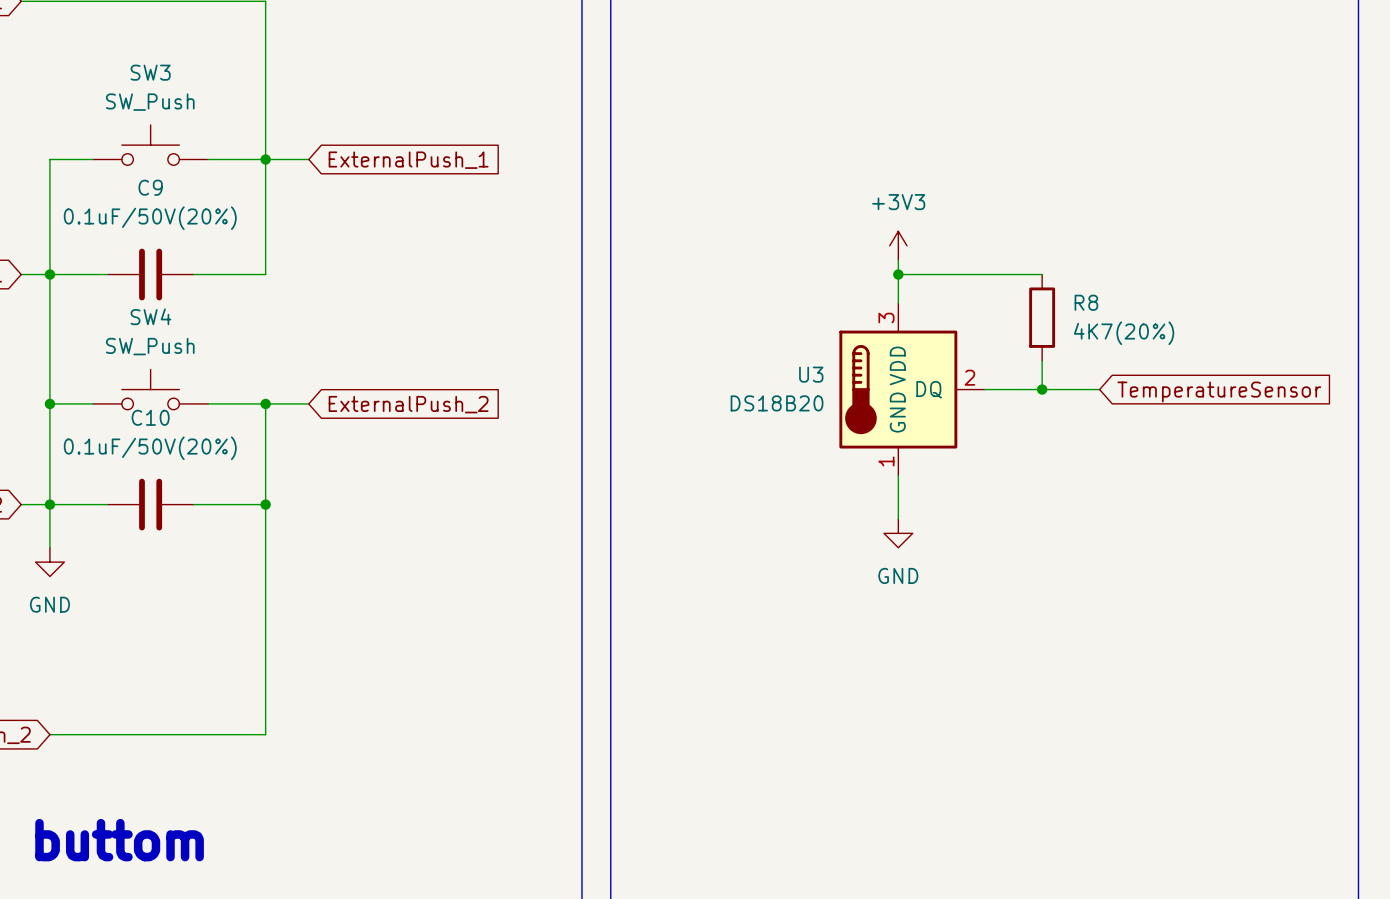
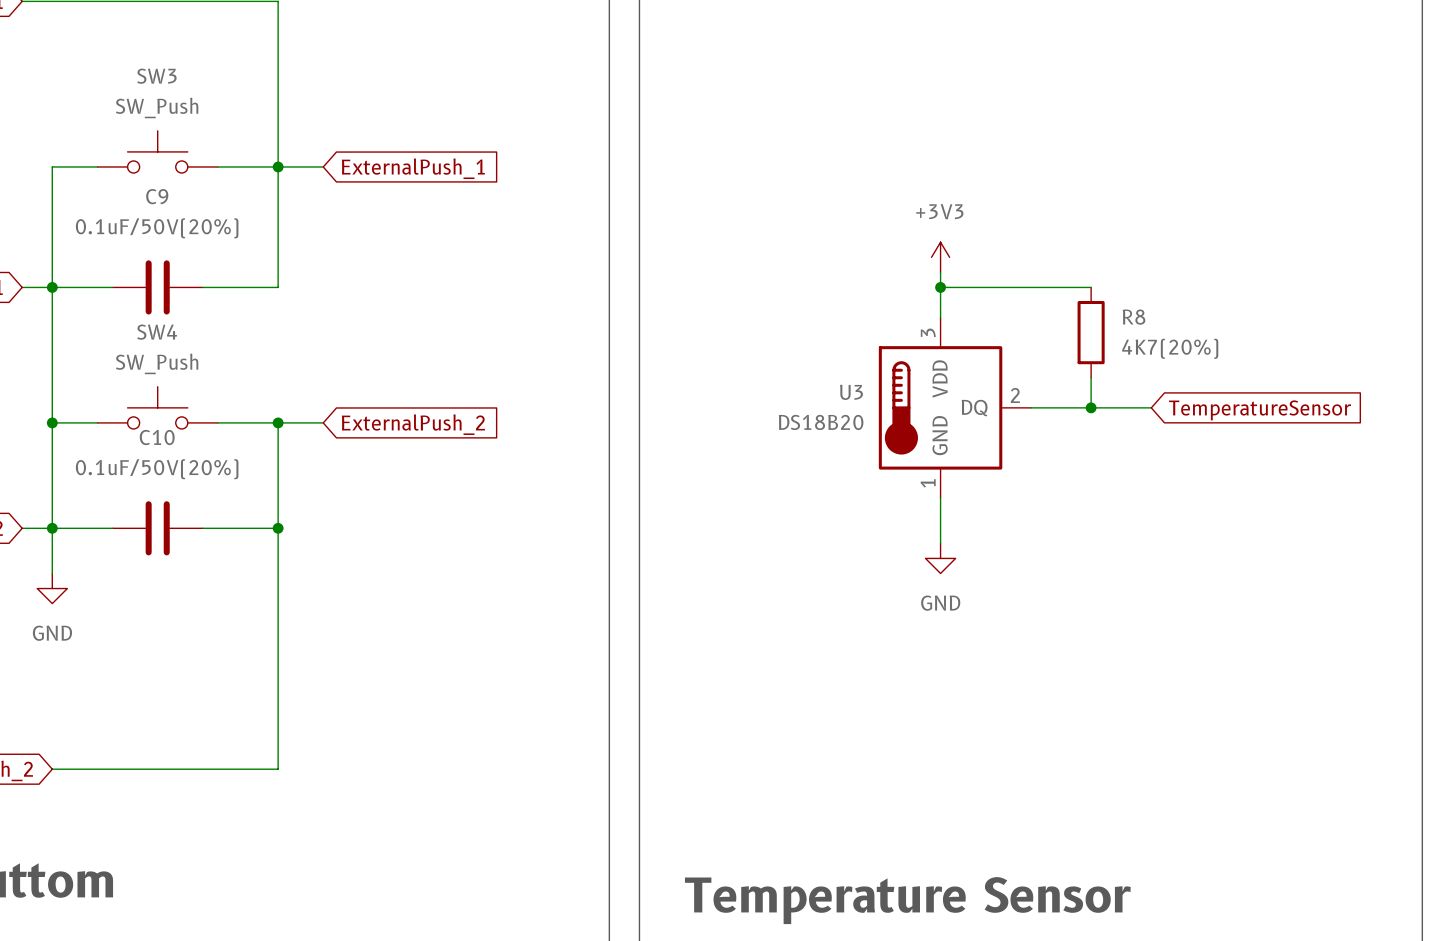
text: none -> Temperature Sensor (907, 900)

